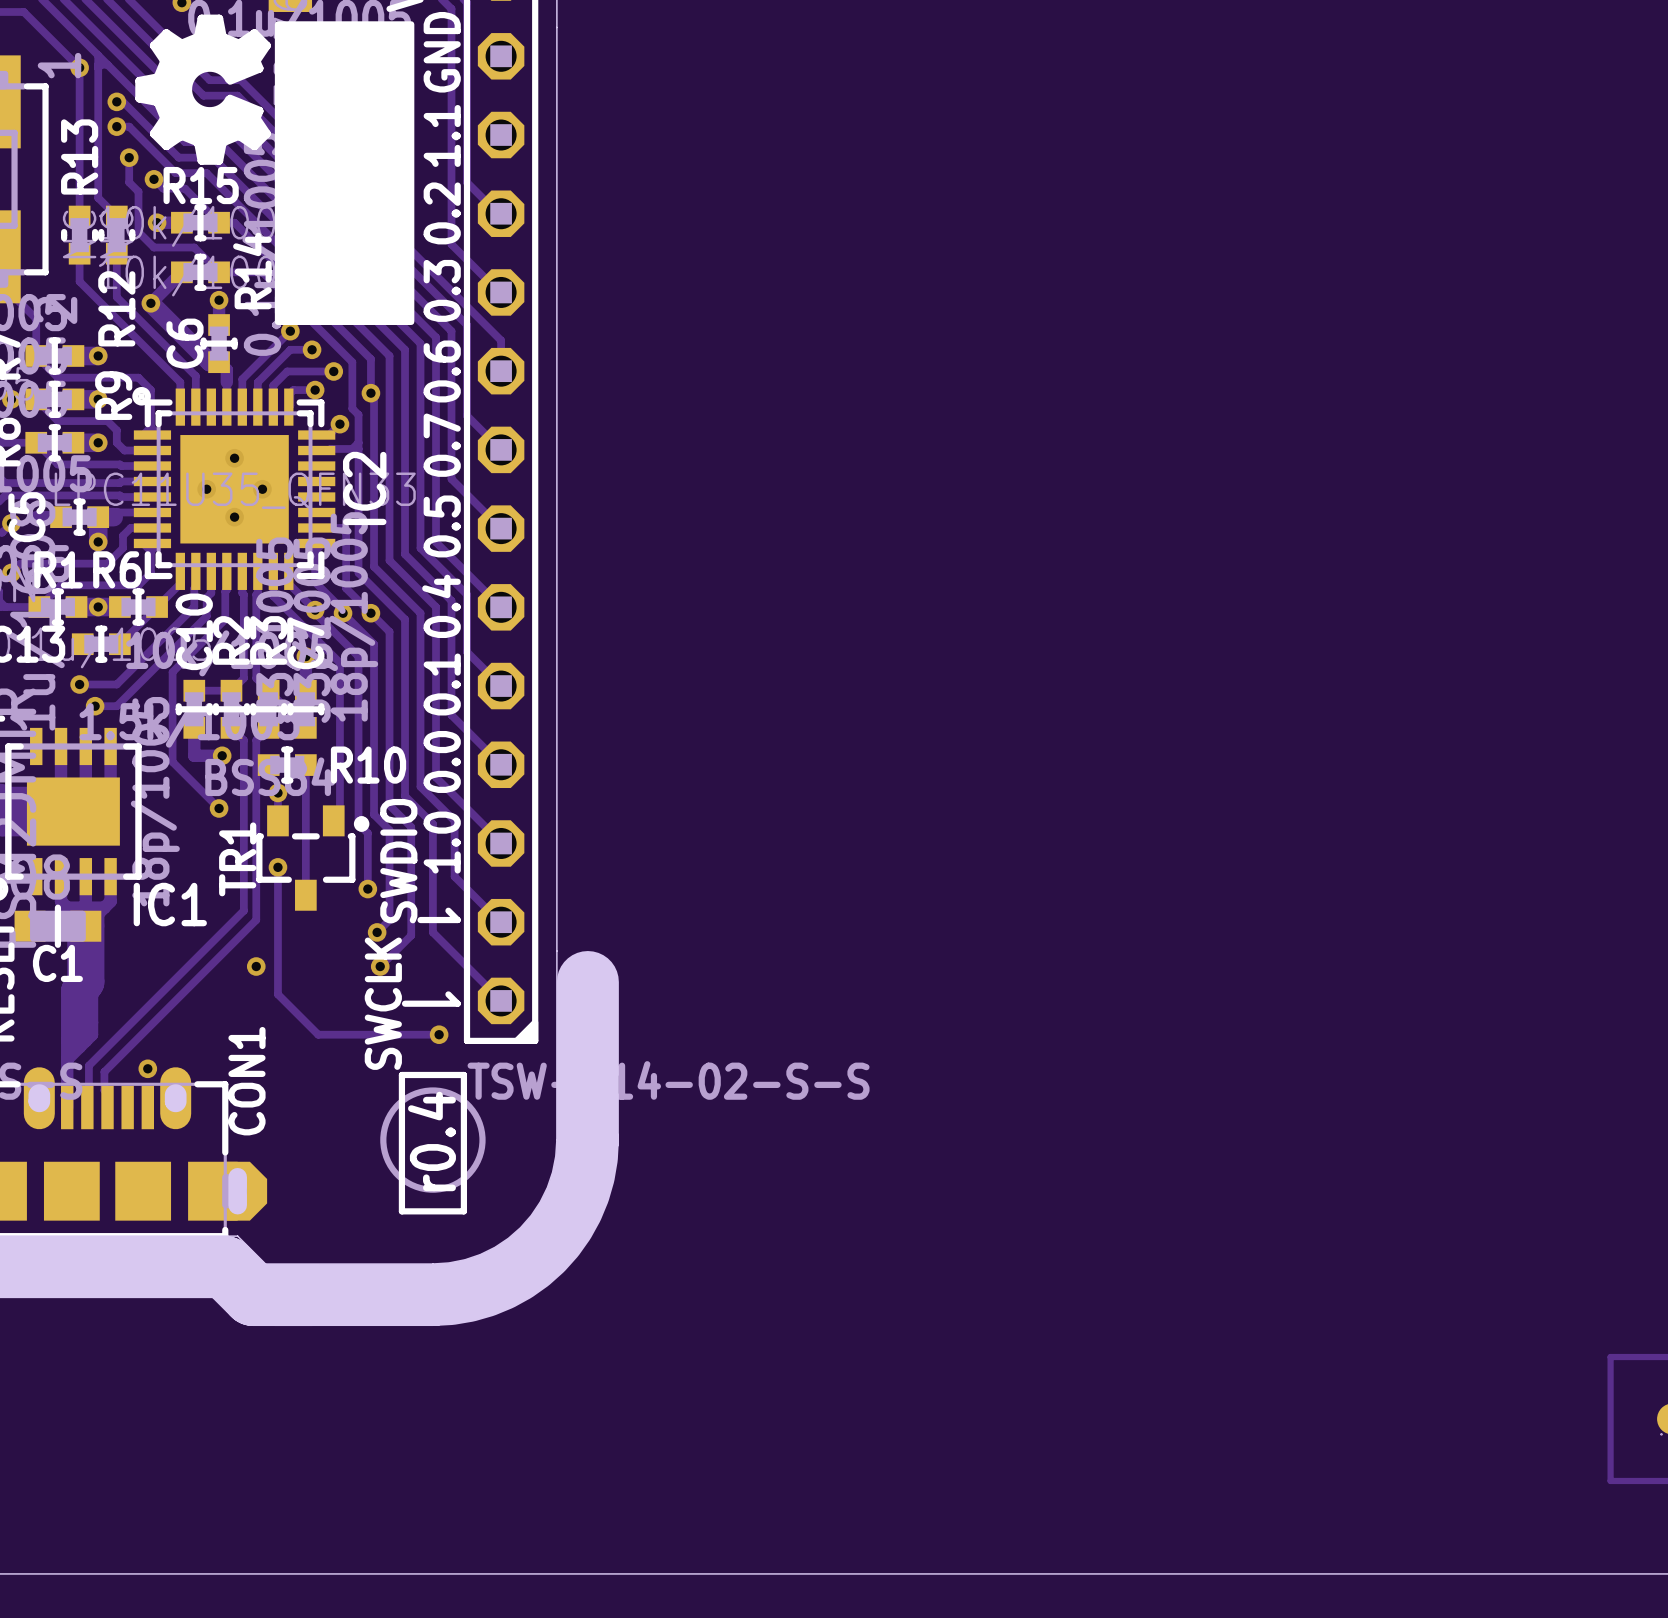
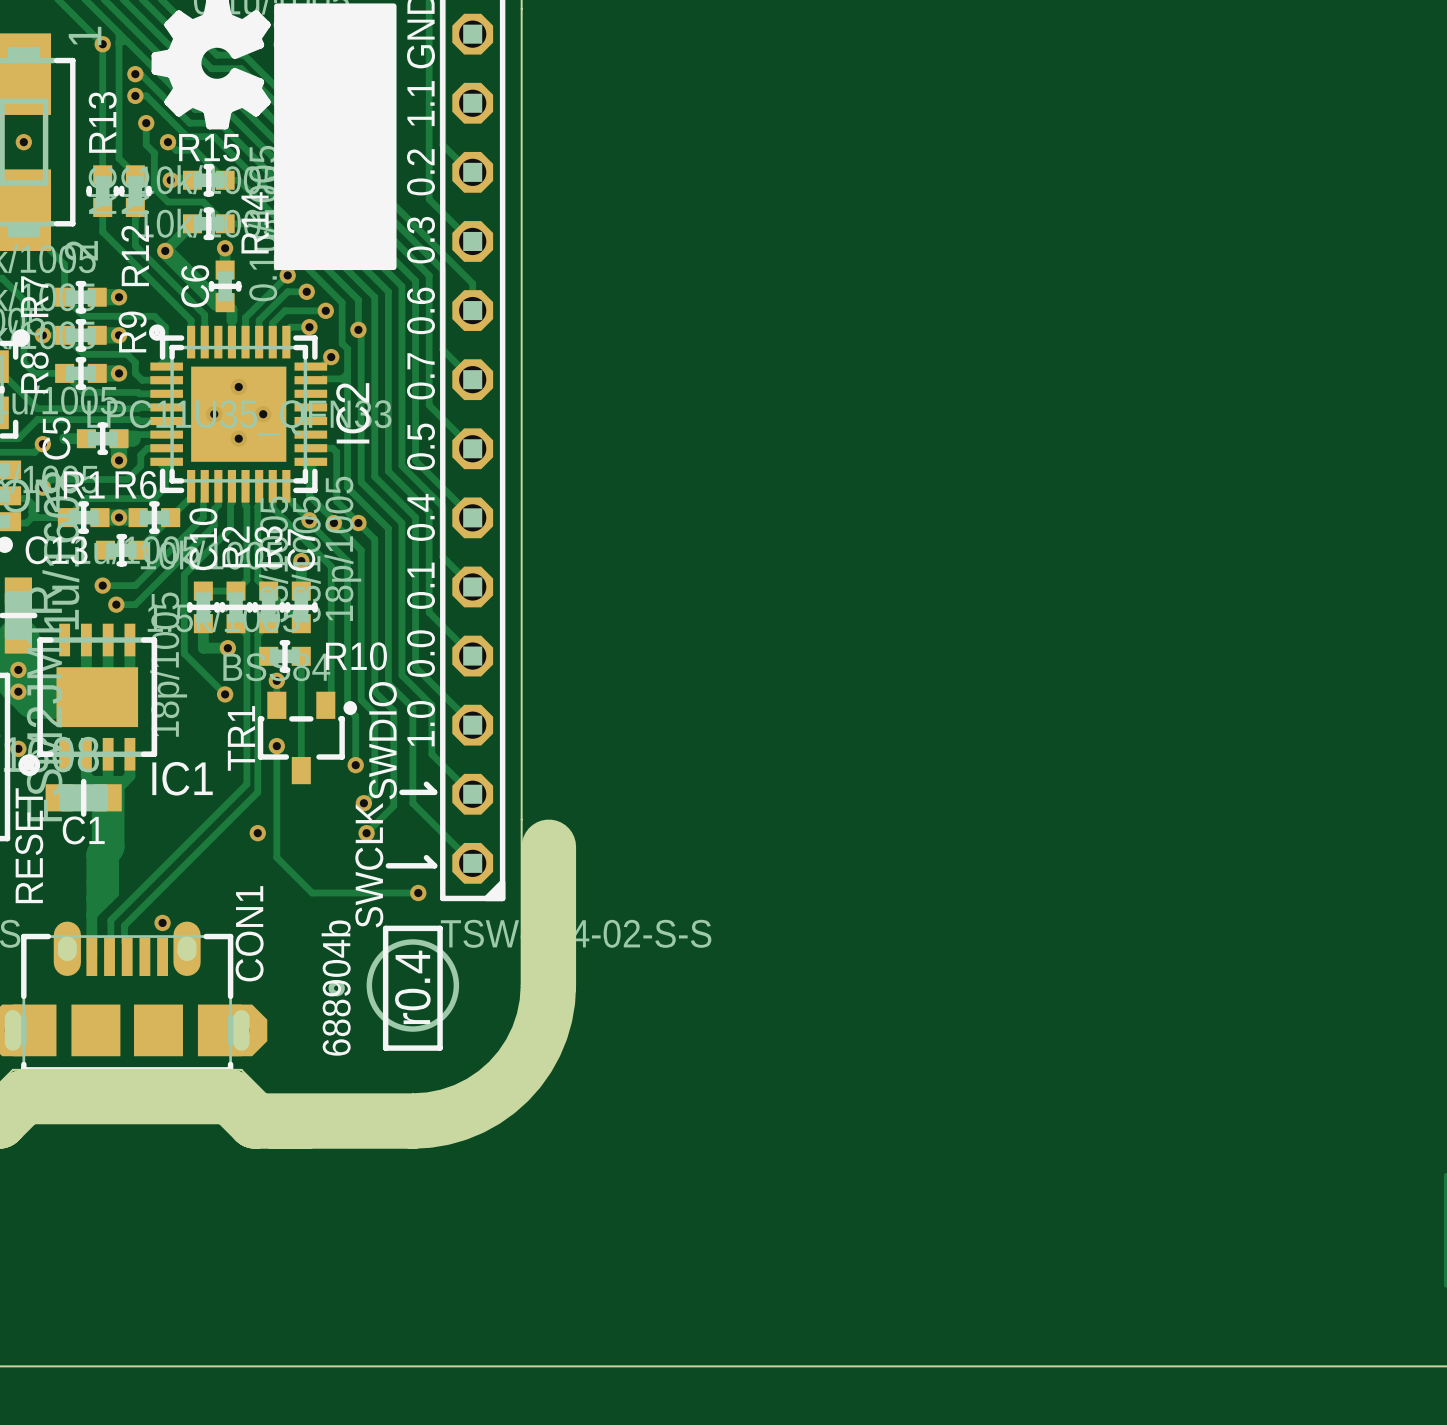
drawing: none -> [328, 980, 345, 997]

